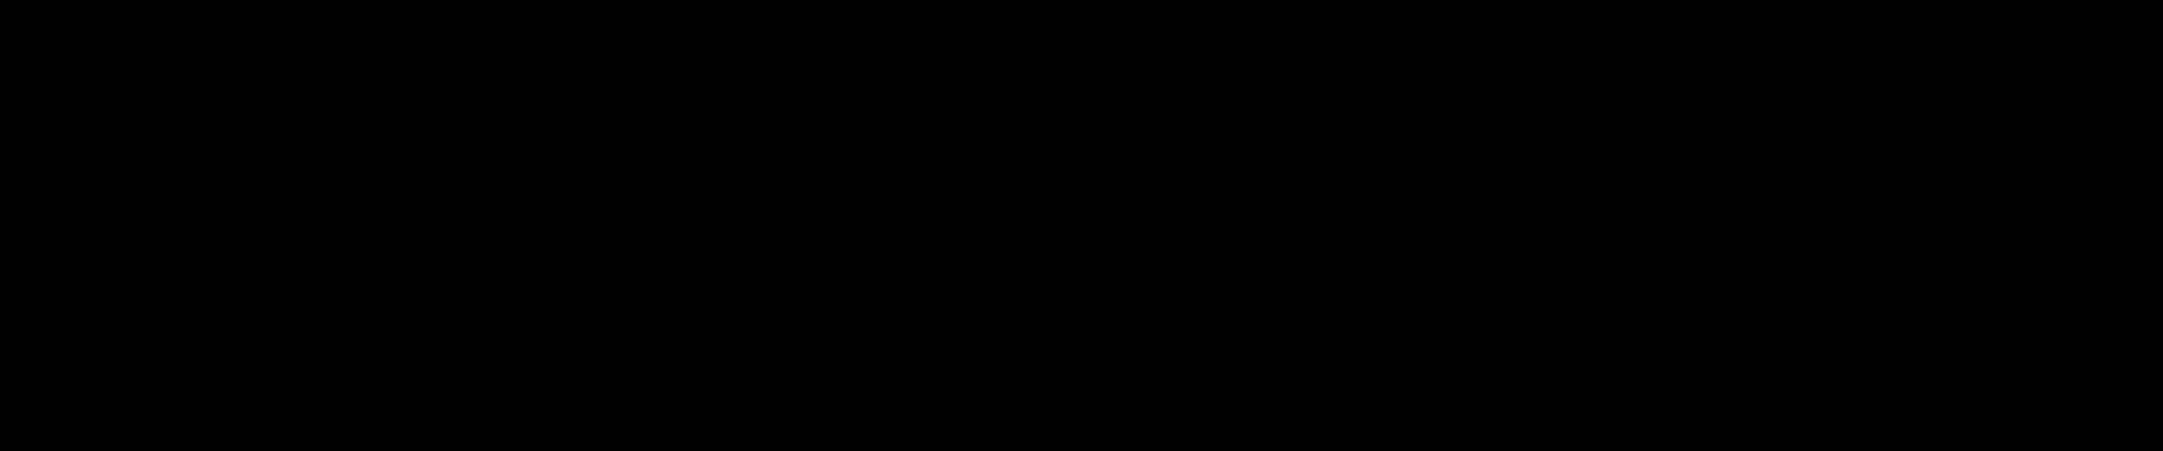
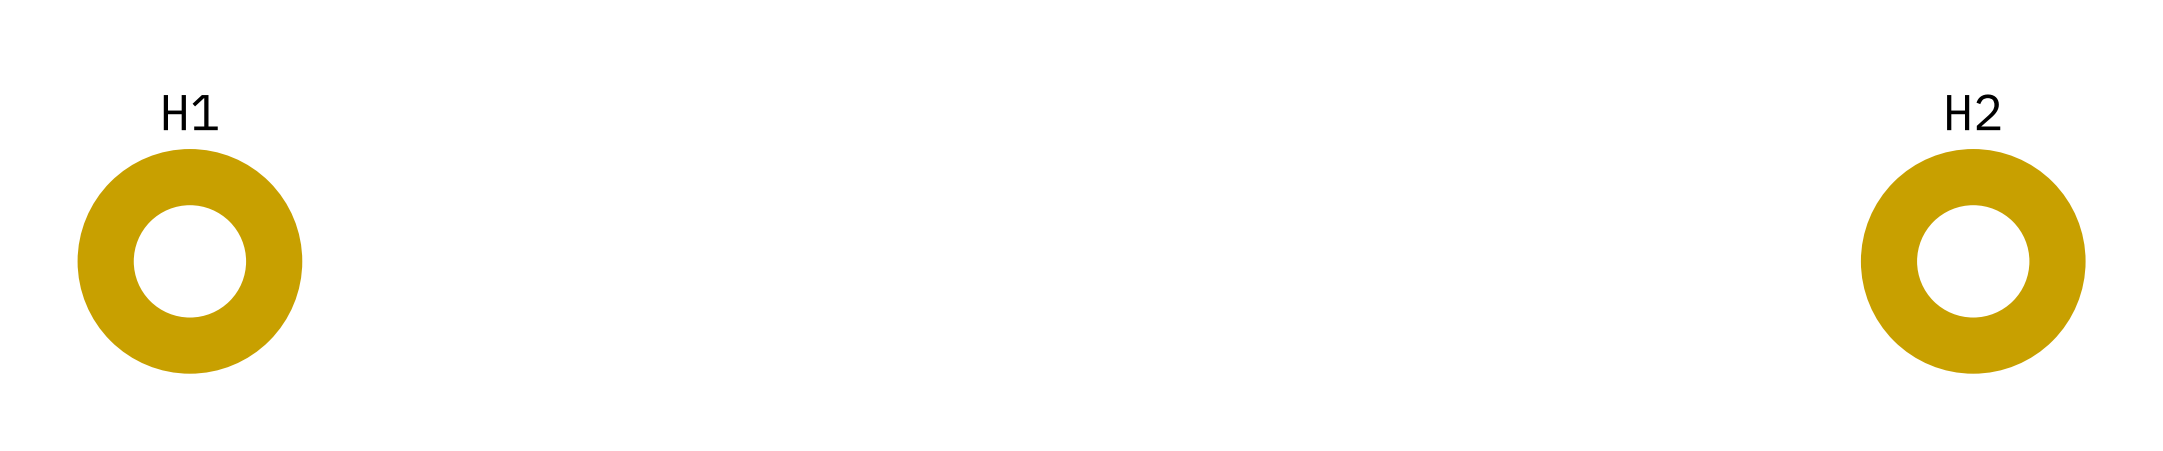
H1: none -> (189, 261)
H2: none -> (1973, 261)

